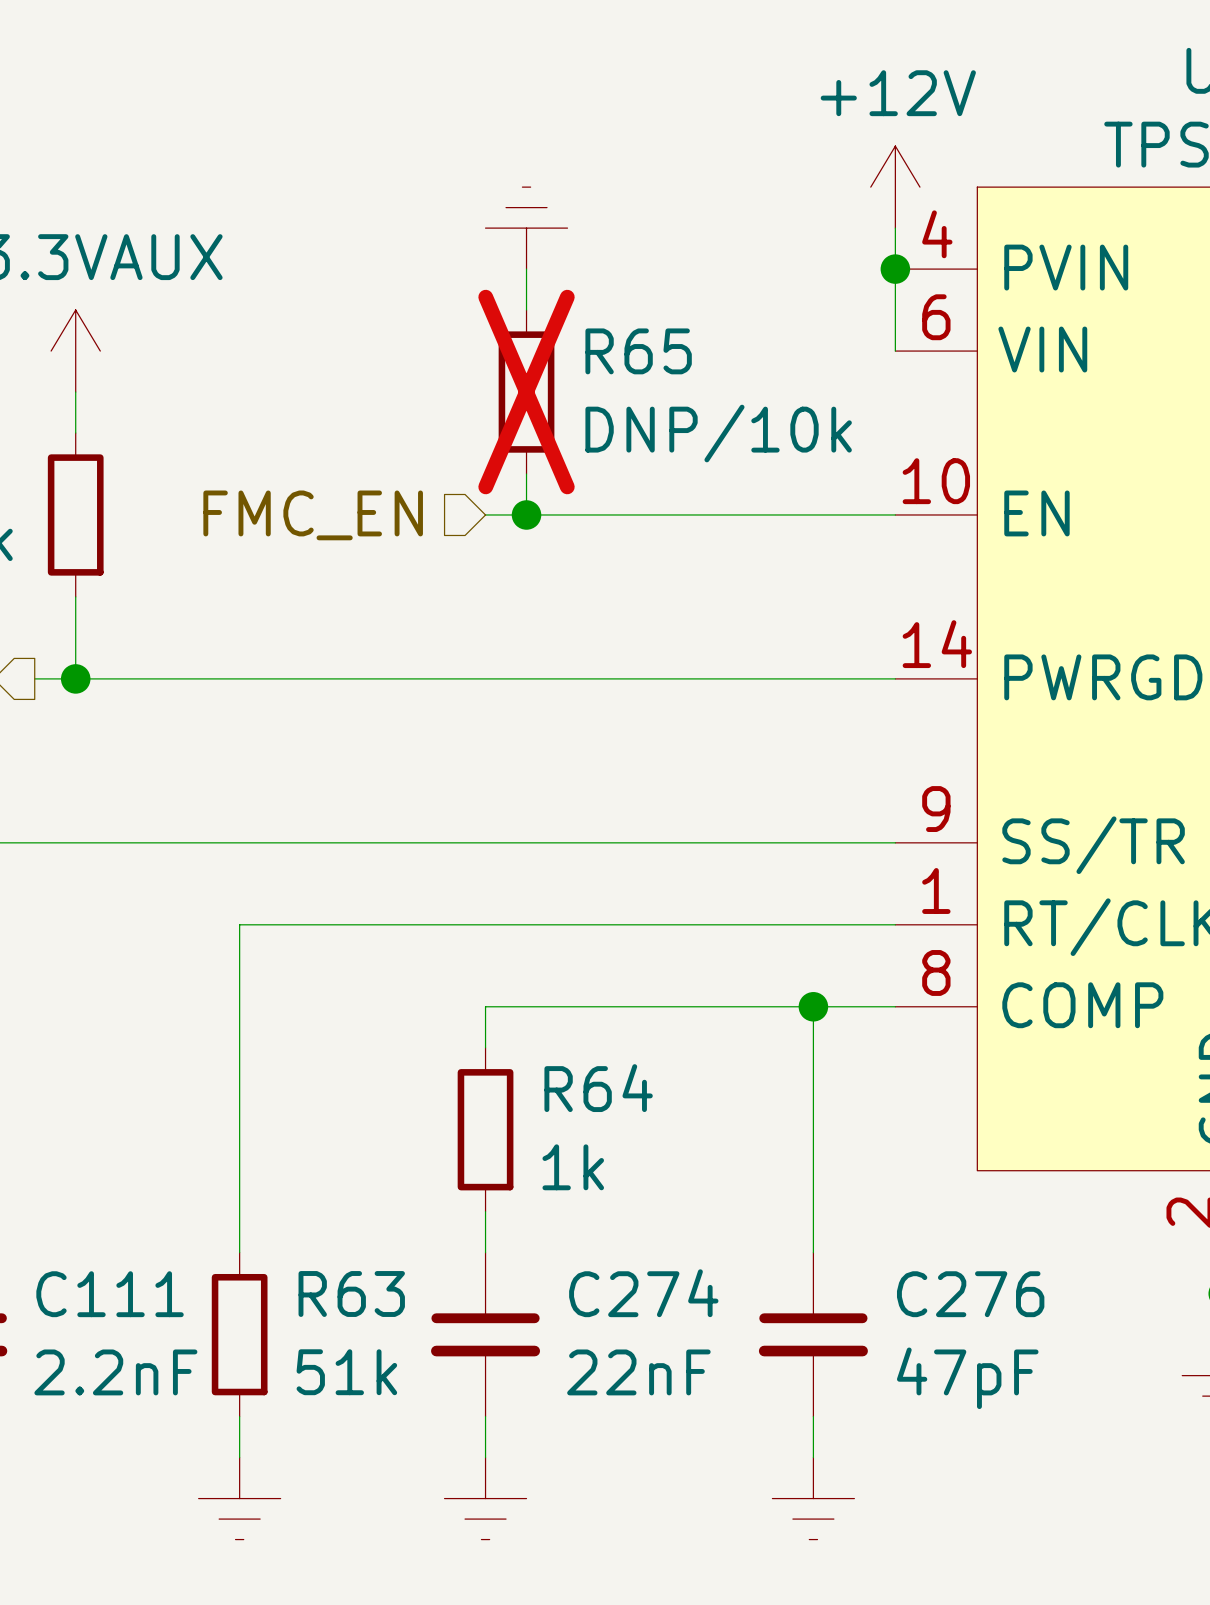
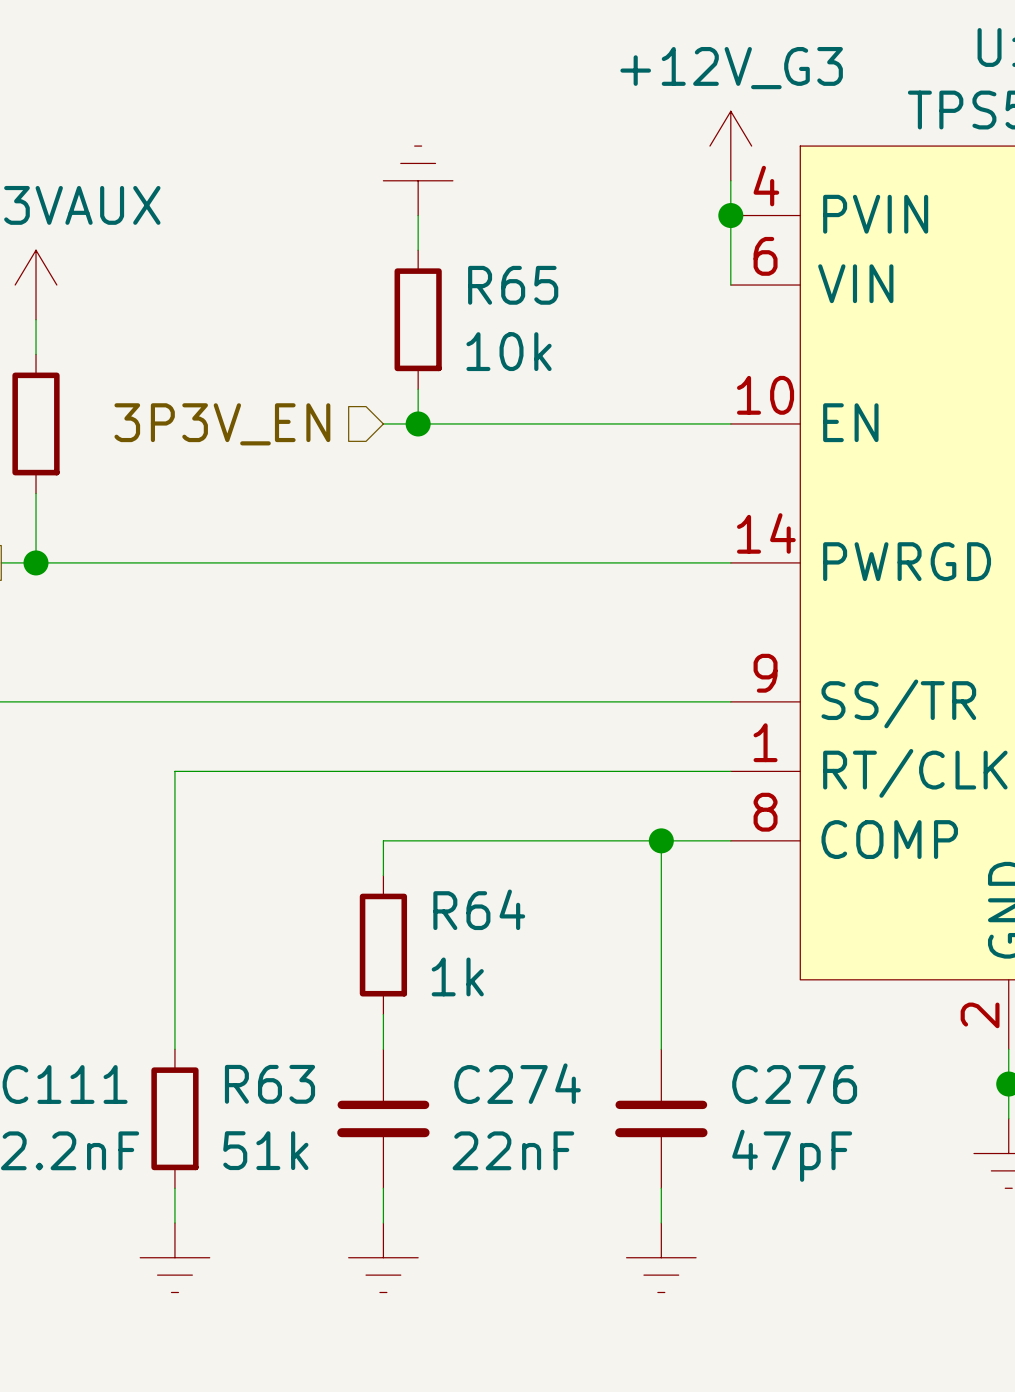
power symbol: +12V (895, 187) -> +12V_G3 (730, 146)
R65 do-not-place cross: (526, 392) -> none
R65 value: DNP/10k (718, 433) -> 10k (509, 351)
hierarchical label: FMC_EN (313, 515) -> 3P3V_EN (222, 424)

